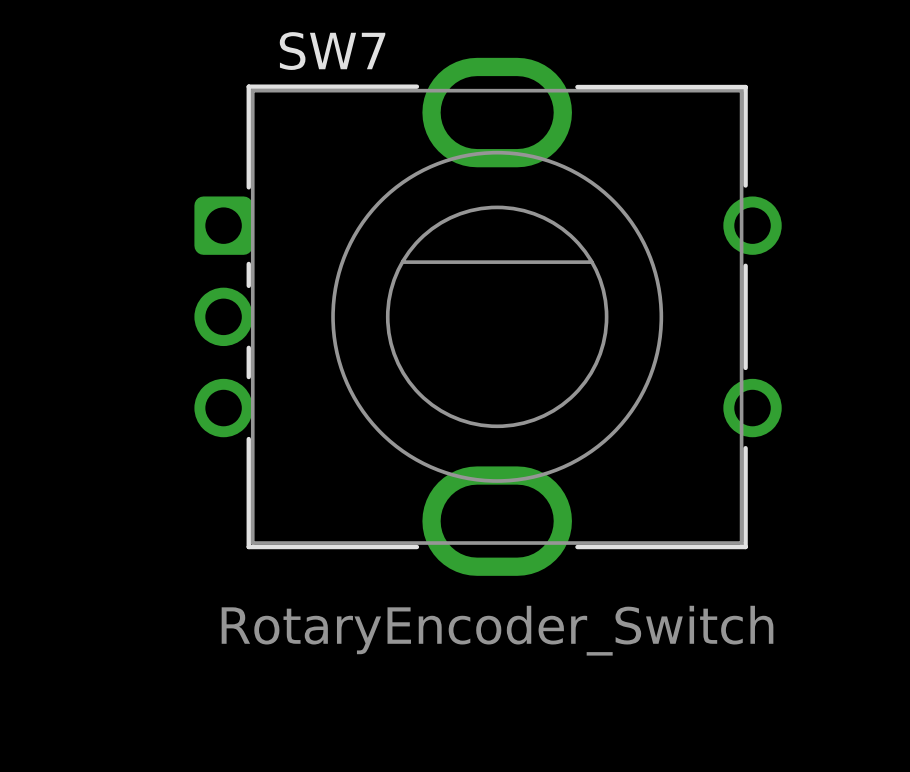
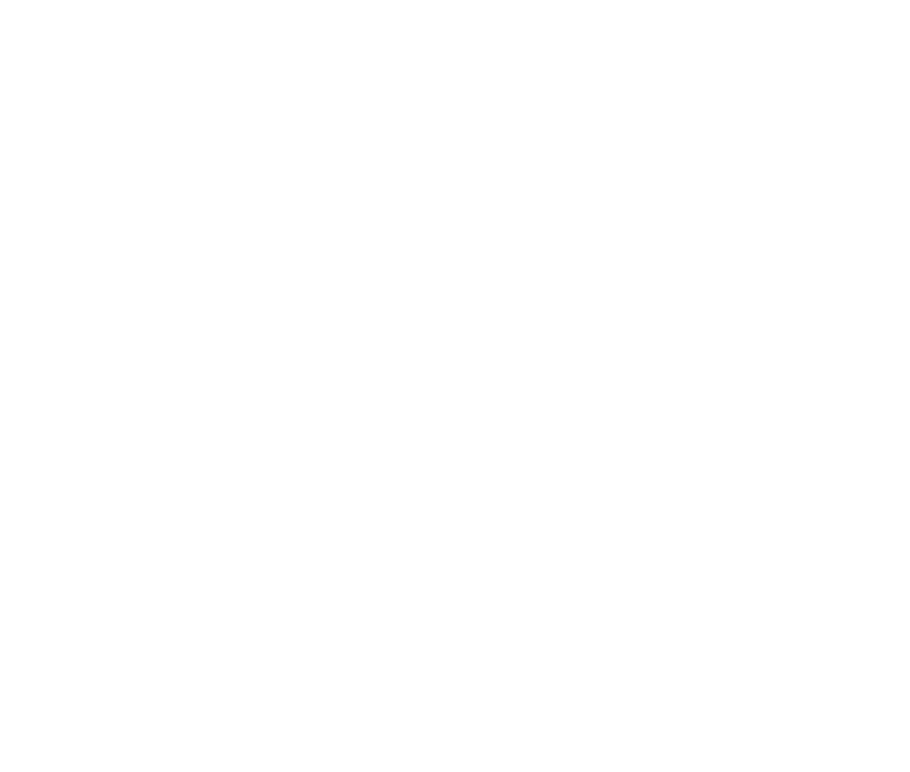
SW7: RotaryEncoder_Switch (488, 316) -> none

